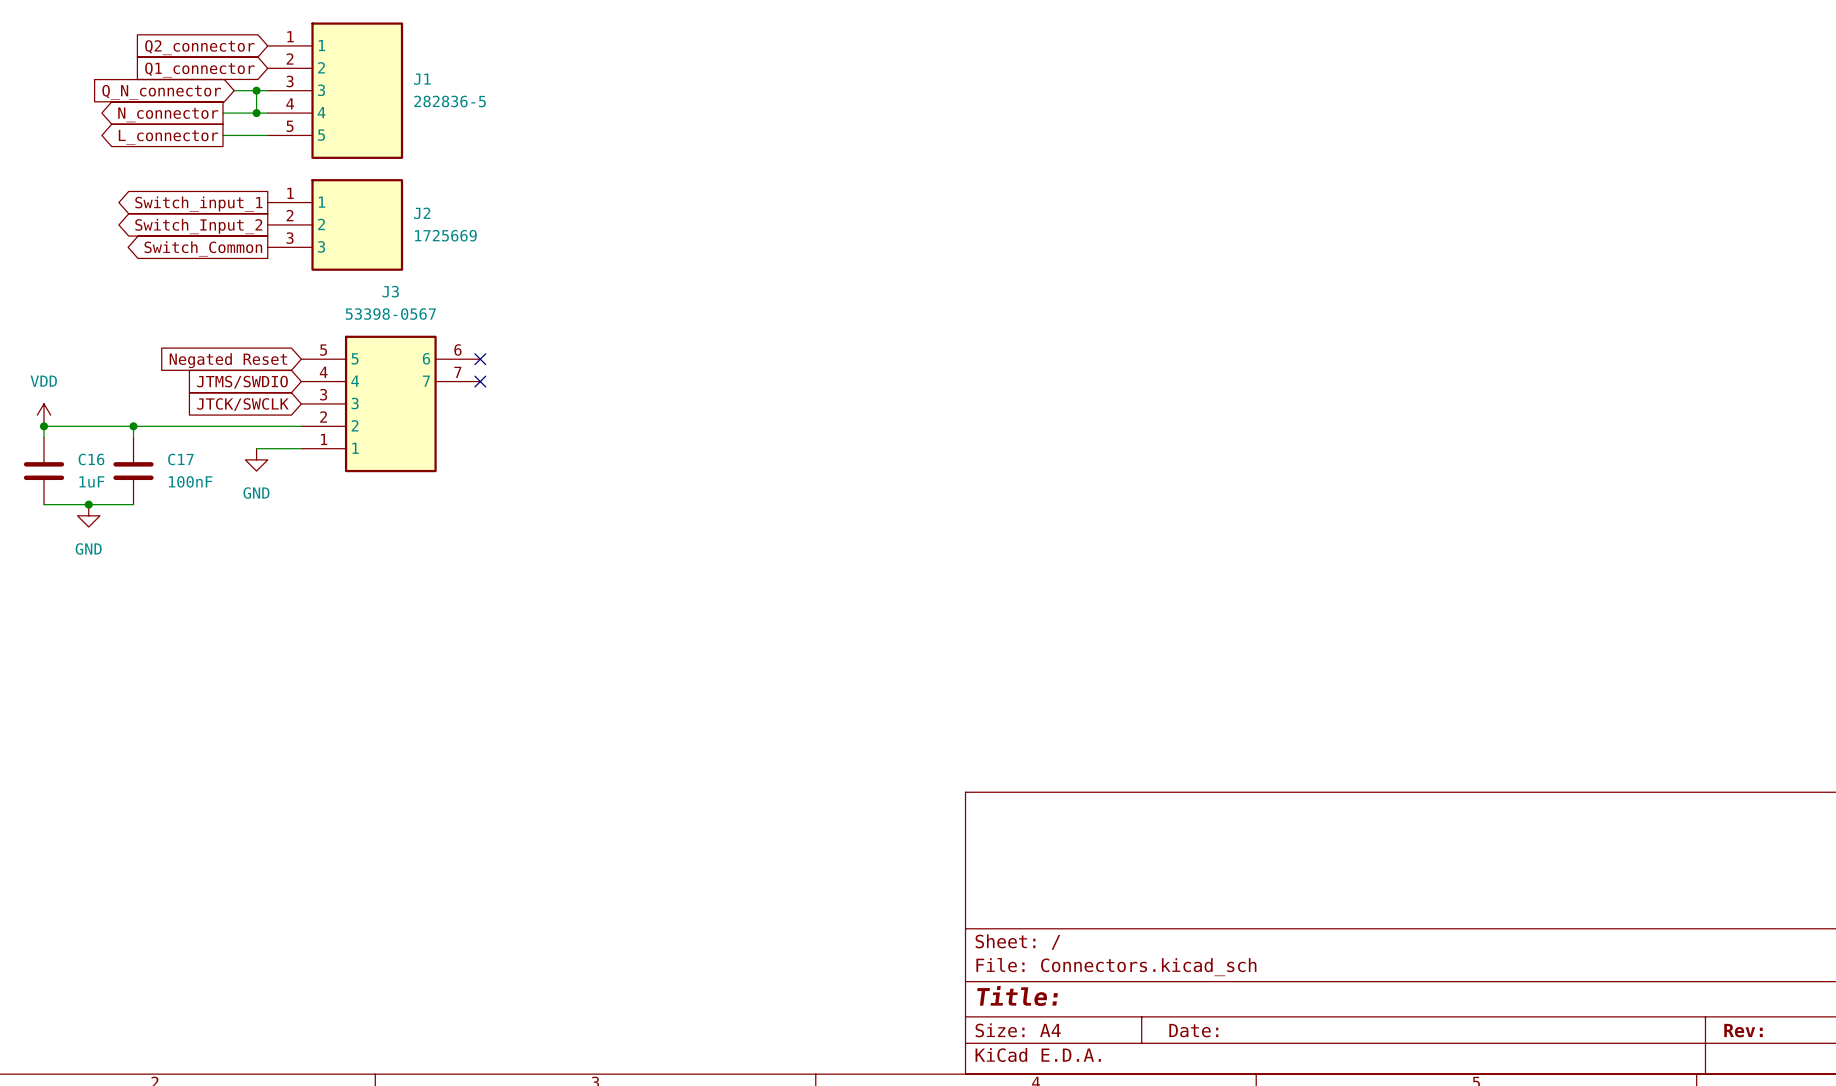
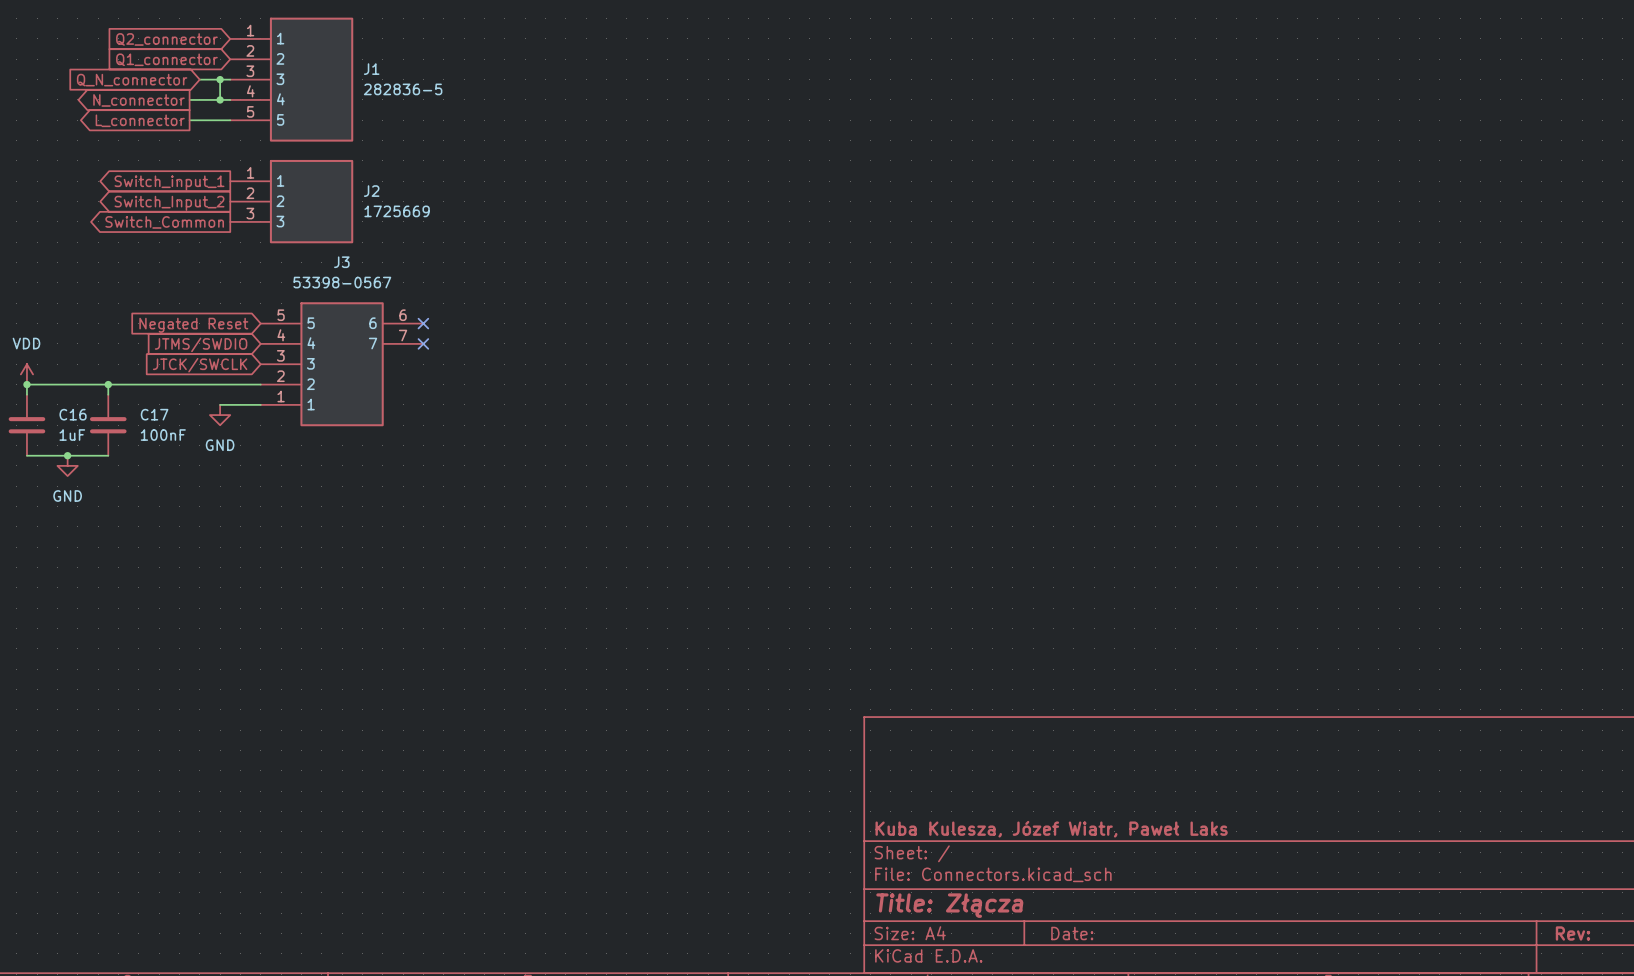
title block: none -> Kuba Kulesza, Józef Wiatr, Paweł Laks (1051, 829)
title block: Title: (1017, 996) -> Title: Złącza (949, 905)

